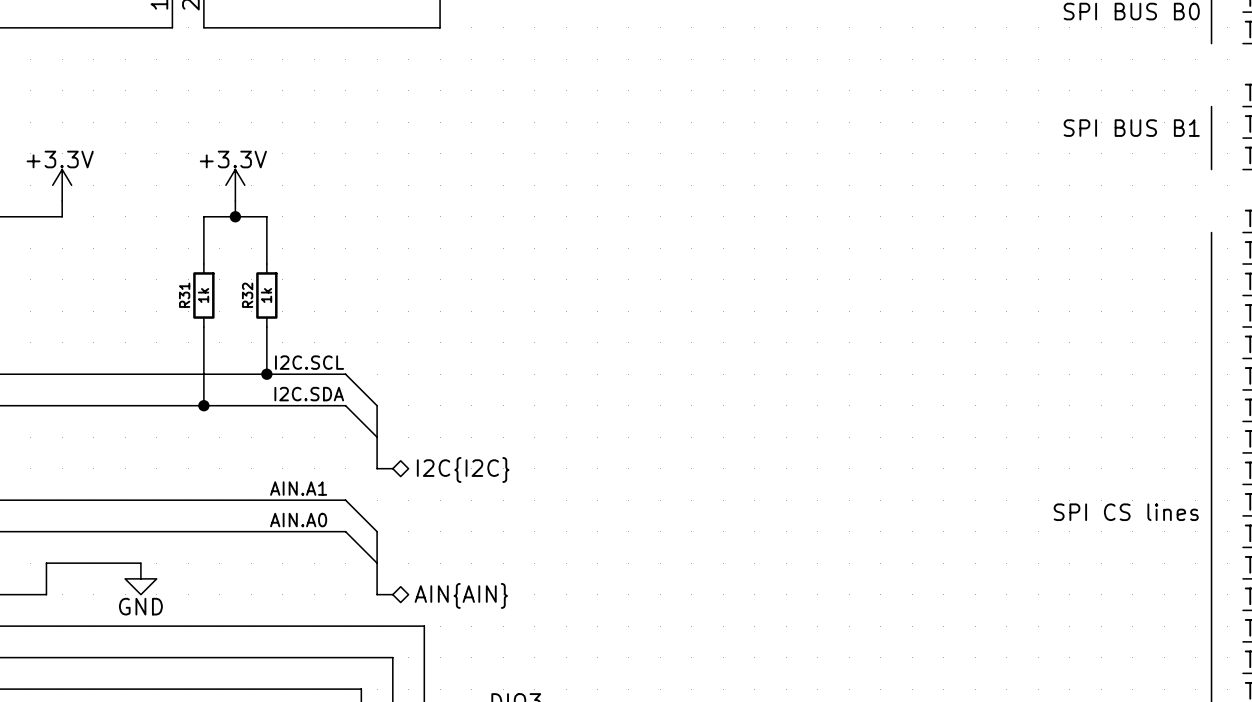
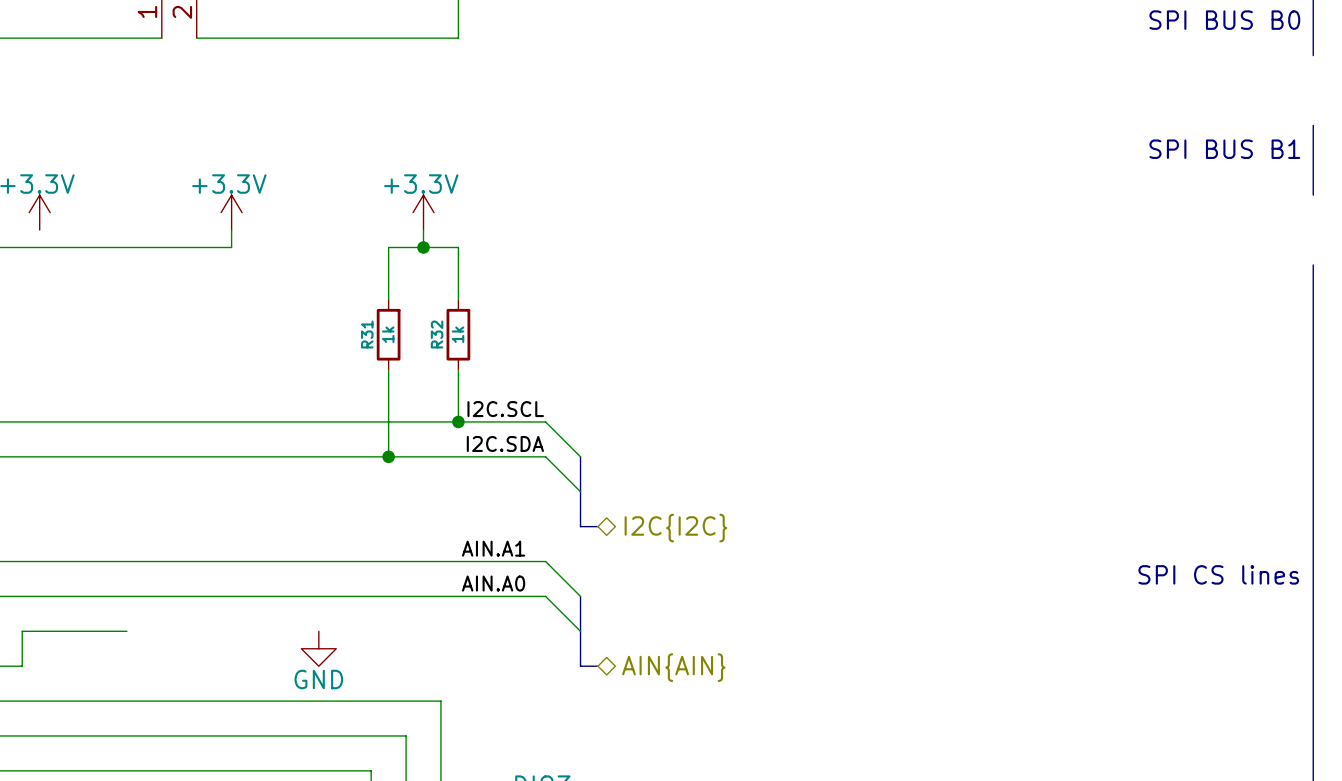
power symbol: none -> +3.3V (423, 212)
wire: (62, 201) (62, 216) -> (196, 247) (39, 247)
wire: none -> (423, 230) (423, 247)
wire: (203, 216) (203, 264) -> none
wire: (235, 216) (266, 216) (266, 264) -> none
junction: (235, 216) -> none
junction: none -> (423, 247)
wire: none -> (388, 299) (388, 247) (458, 247) (458, 299)
R31 position: (203, 295) -> (388, 334)
R32 position: (266, 295) -> (458, 334)
wire: (203, 326) (203, 405) -> none
wire: (266, 326) (266, 374) -> (458, 369) (458, 421)
label position: I2C.SCL (309, 362) -> I2C.SCL (505, 409)
junction: (266, 374) -> none
wire: (345, 374) (377, 405) -> (388, 369) (388, 456)
wire: none -> (353, 421) (545, 421) (580, 456)
junction: none -> (458, 421)
label position: I2C.SDA (309, 394) -> I2C.SDA (505, 443)
junction: (203, 405) -> none
wire: (345, 405) (377, 437) -> (353, 456) (545, 456) (580, 491)
bus: (377, 405) (377, 468) (392, 468) -> (580, 456) (580, 526) (597, 526)
junction: none -> (388, 456)
hierarchical label position: I2C{I2C} (463, 469) -> I2C{I2C} (675, 528)
label position: AIN.A1 (298, 488) -> AIN.A1 (493, 548)
wire: (345, 500) (377, 531) -> (353, 561) (545, 561) (580, 596)
label position: AIN.A0 (298, 520) -> AIN.A0 (493, 583)
wire: (345, 531) (377, 563) -> (353, 596) (545, 596) (580, 631)
bus: (377, 531) (377, 594) (392, 594) -> (580, 596) (580, 666) (597, 666)
power symbol position: GND (140, 578) -> GND (318, 648)
hierarchical label position: AIN{AIN} (461, 595) -> AIN{AIN} (673, 667)

